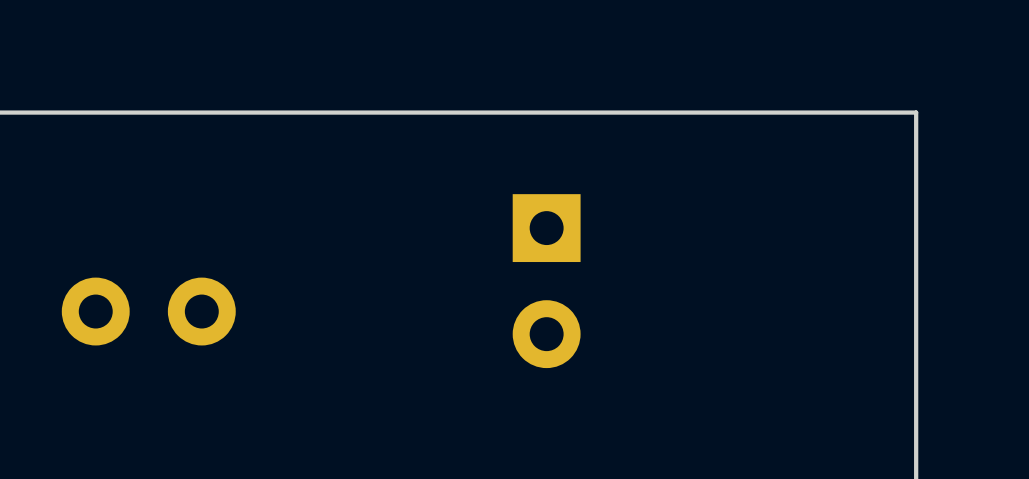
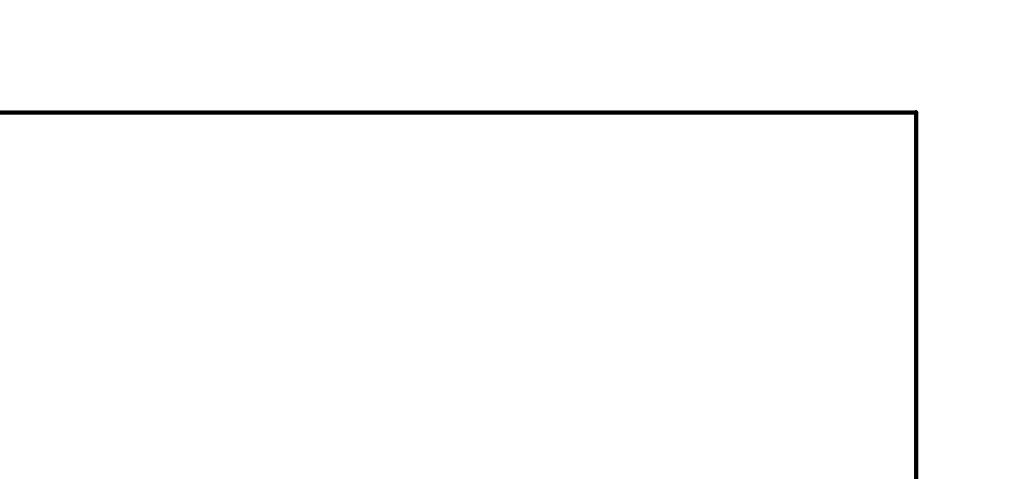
part: (546, 281) -> none
part: (148, 311) -> none

